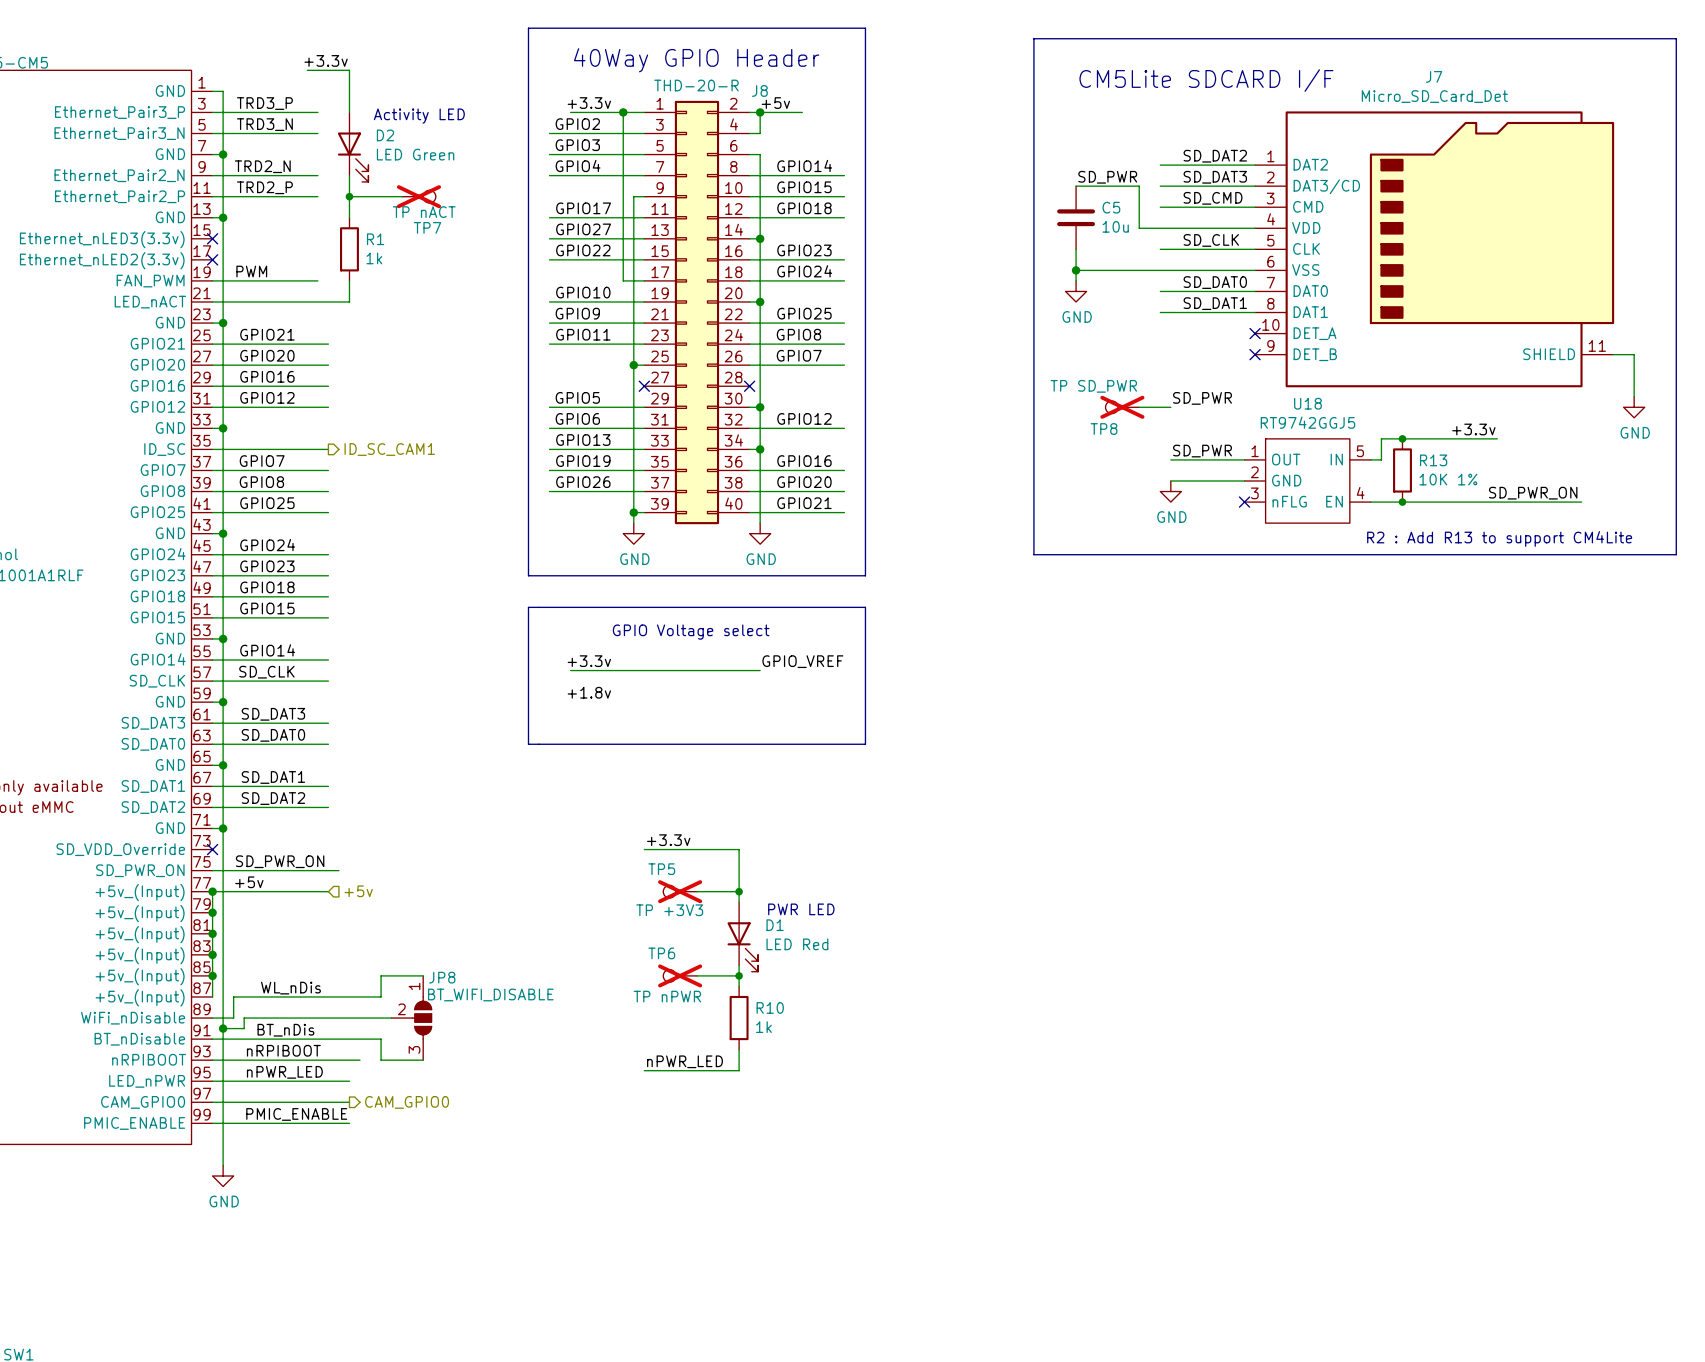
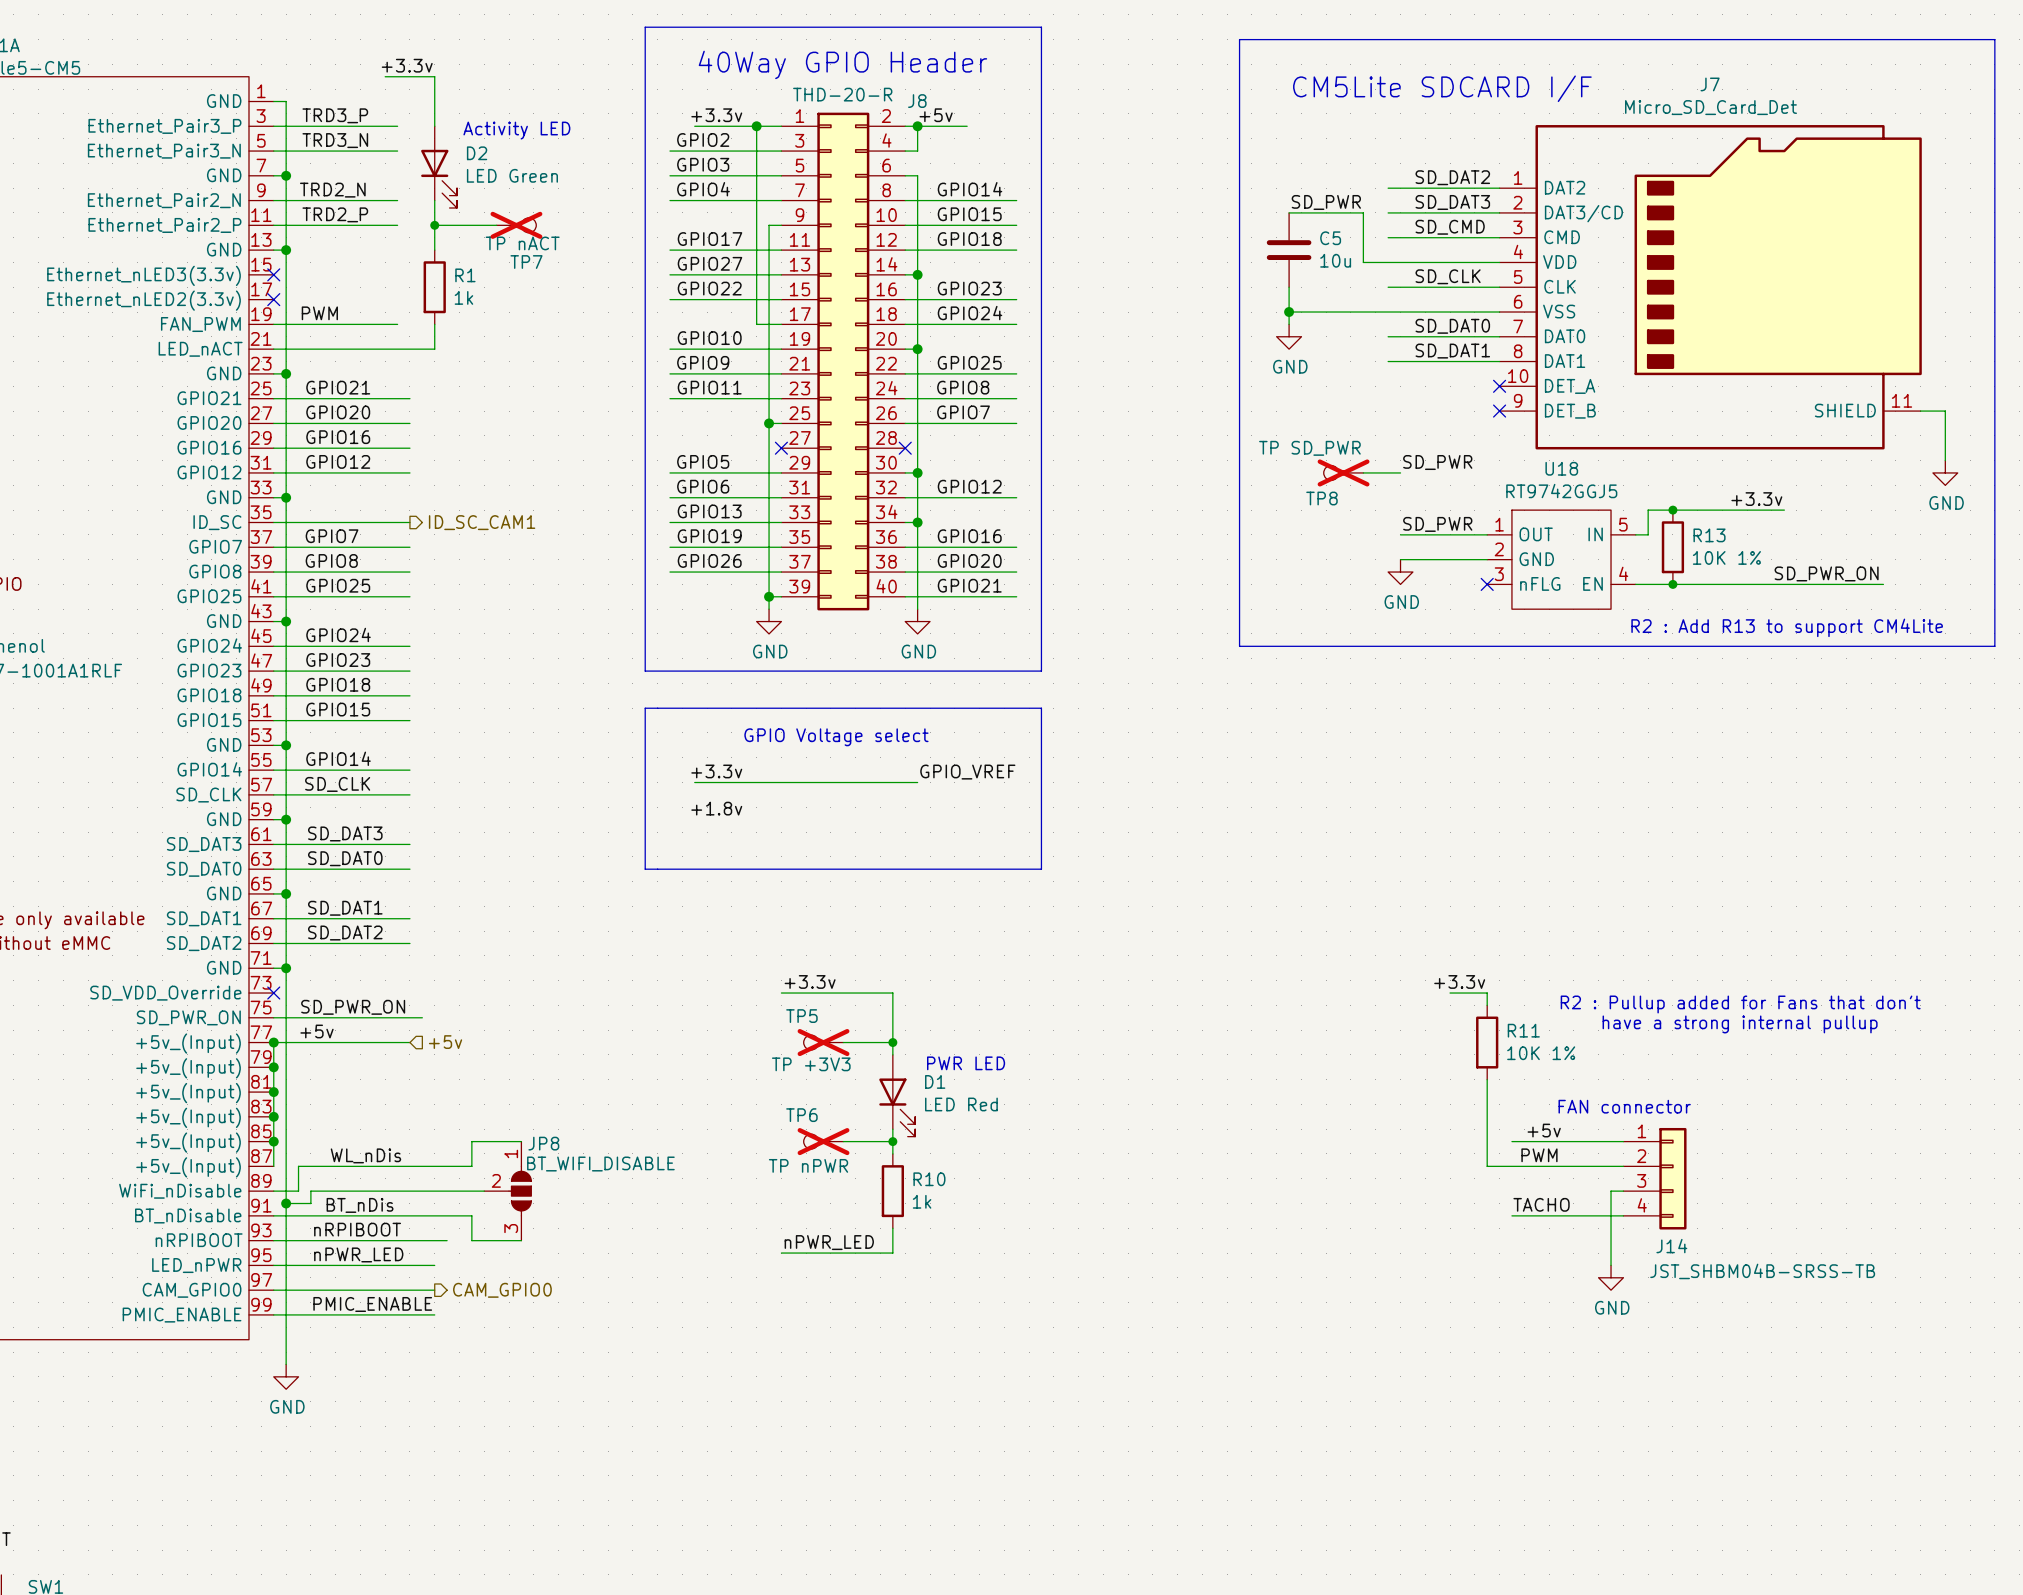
label: none -> +3.3v (1459, 981)
wire: none -> (1450, 993) (1487, 993) (1487, 1005)
text: none -> R2 : Pullup added for Fans that don't (1740, 1004)
text: none -> have a strong internal pullup (1740, 1024)
R11: none -> 10K 1% (1487, 1042)
wire: none -> (1487, 1079) (1487, 1166) (1623, 1166)
text: none -> FAN connector (1624, 1106)
label: none -> +5v (1544, 1130)
wire: none -> (1511, 1141) (1623, 1141)
label: none -> PWM (1539, 1155)
J14: none -> JST_SHBM04B-SRSS-TB (1654, 1178)
wire: none -> (1623, 1191) (1611, 1191) (1611, 1265)
label: none -> TACHO (1541, 1204)
wire: none -> (1511, 1215) (1623, 1215)
power symbol: none -> GND (1611, 1277)

